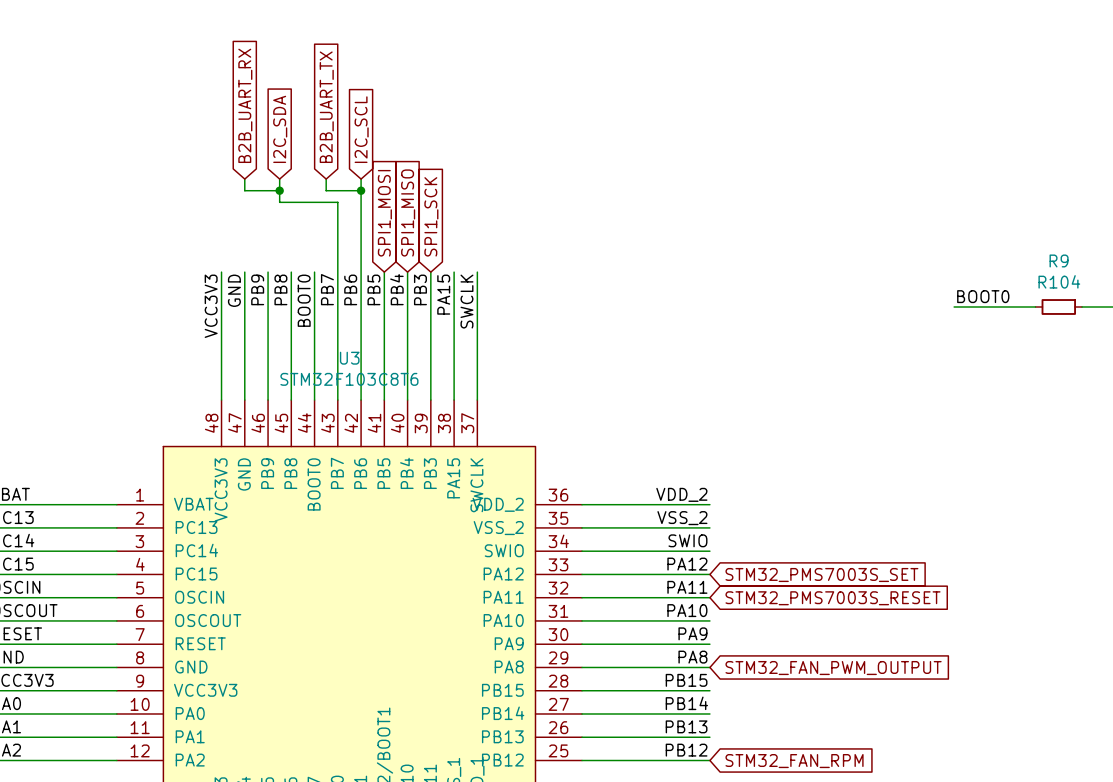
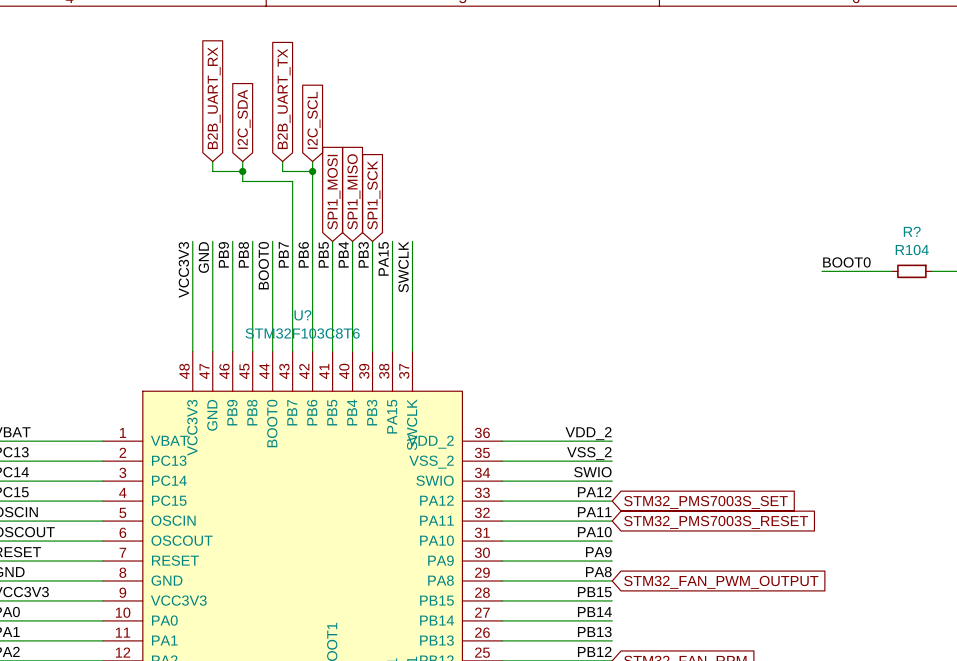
R9 name: R9 (1059, 260) -> R? (912, 231)
U3 name: U3 (349, 358) -> U? (302, 315)

